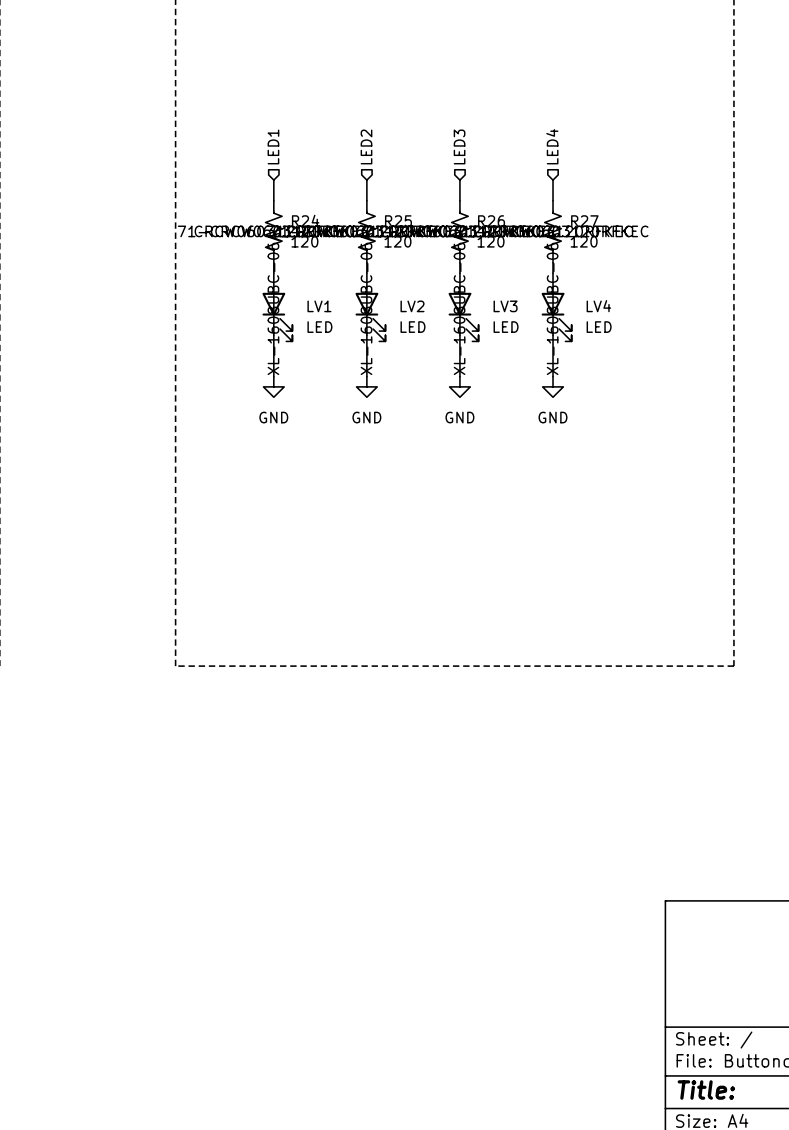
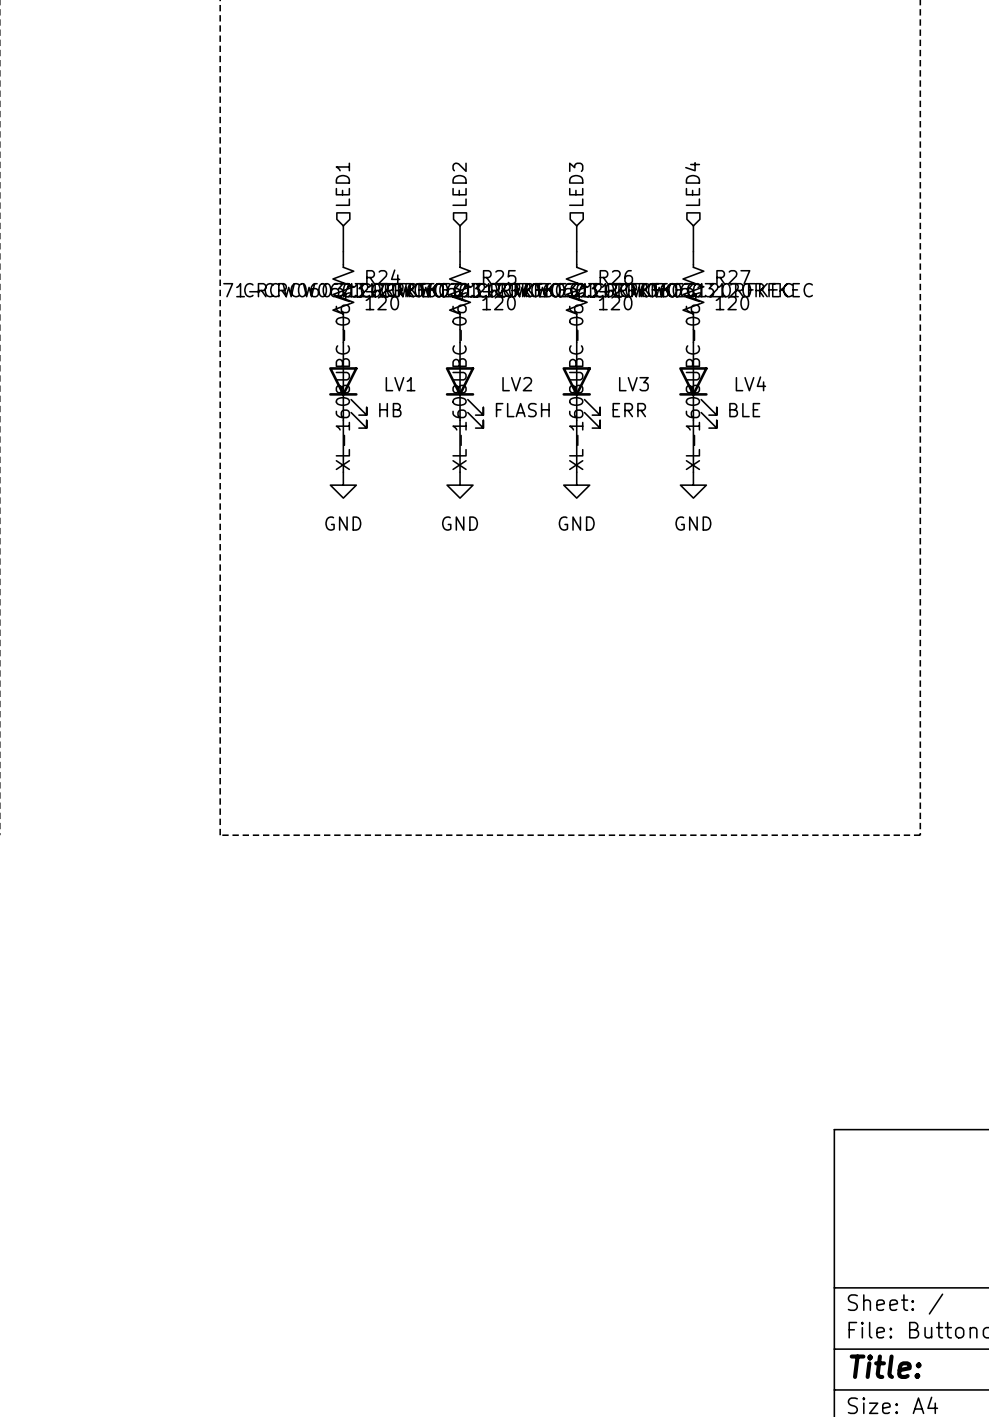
LV1 value: LED (319, 327) -> HB (390, 410)
LV2 value: LED (413, 327) -> FLASH (522, 410)
LV3 value: LED (506, 327) -> ERR (629, 410)
LV4 value: LED (599, 327) -> BLE (744, 410)

